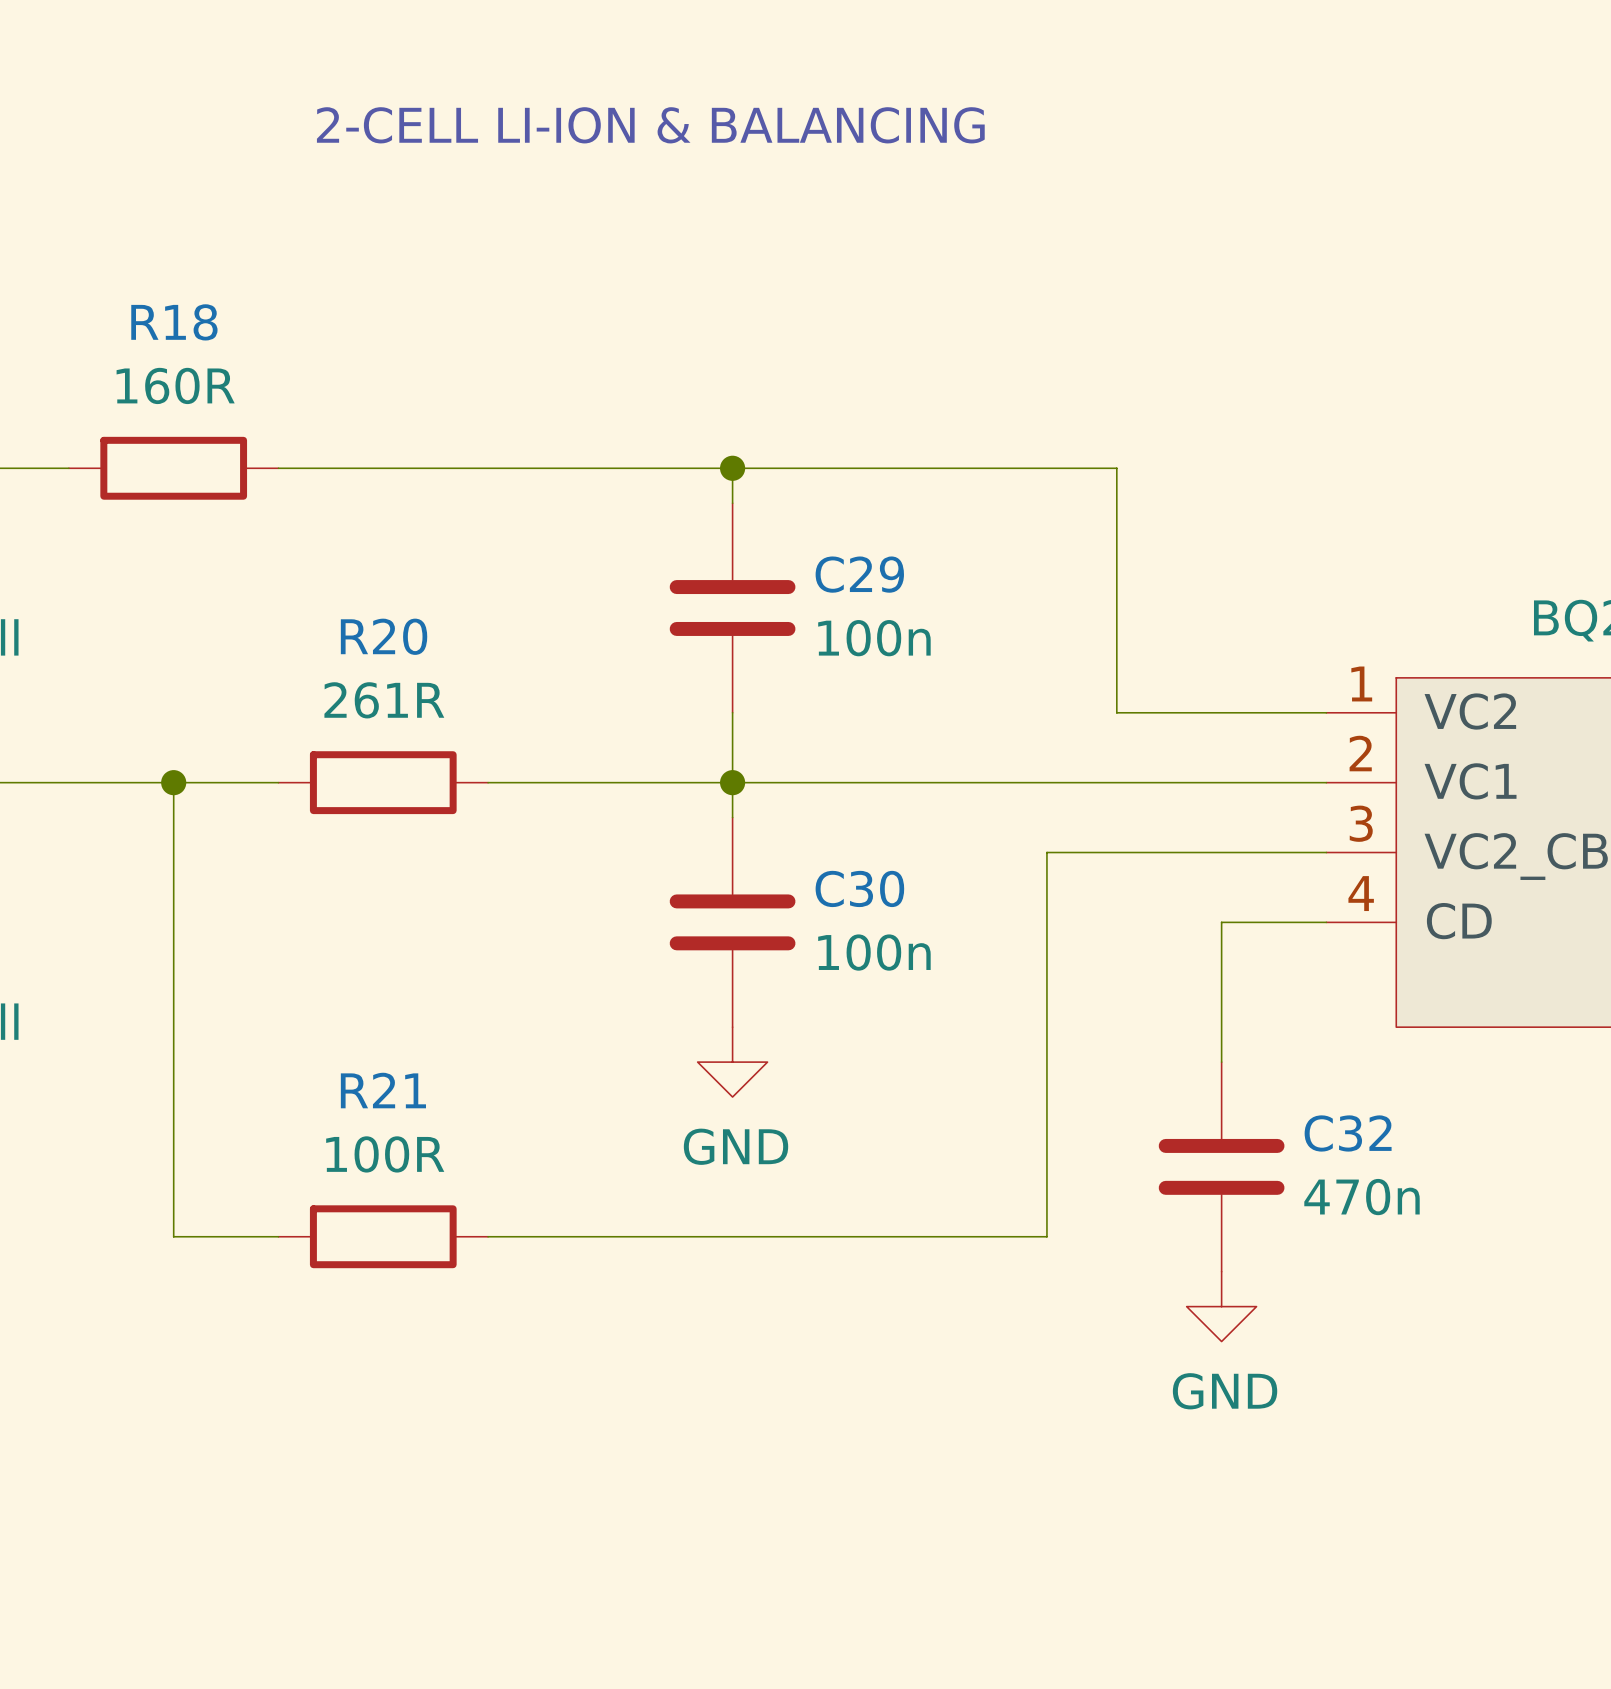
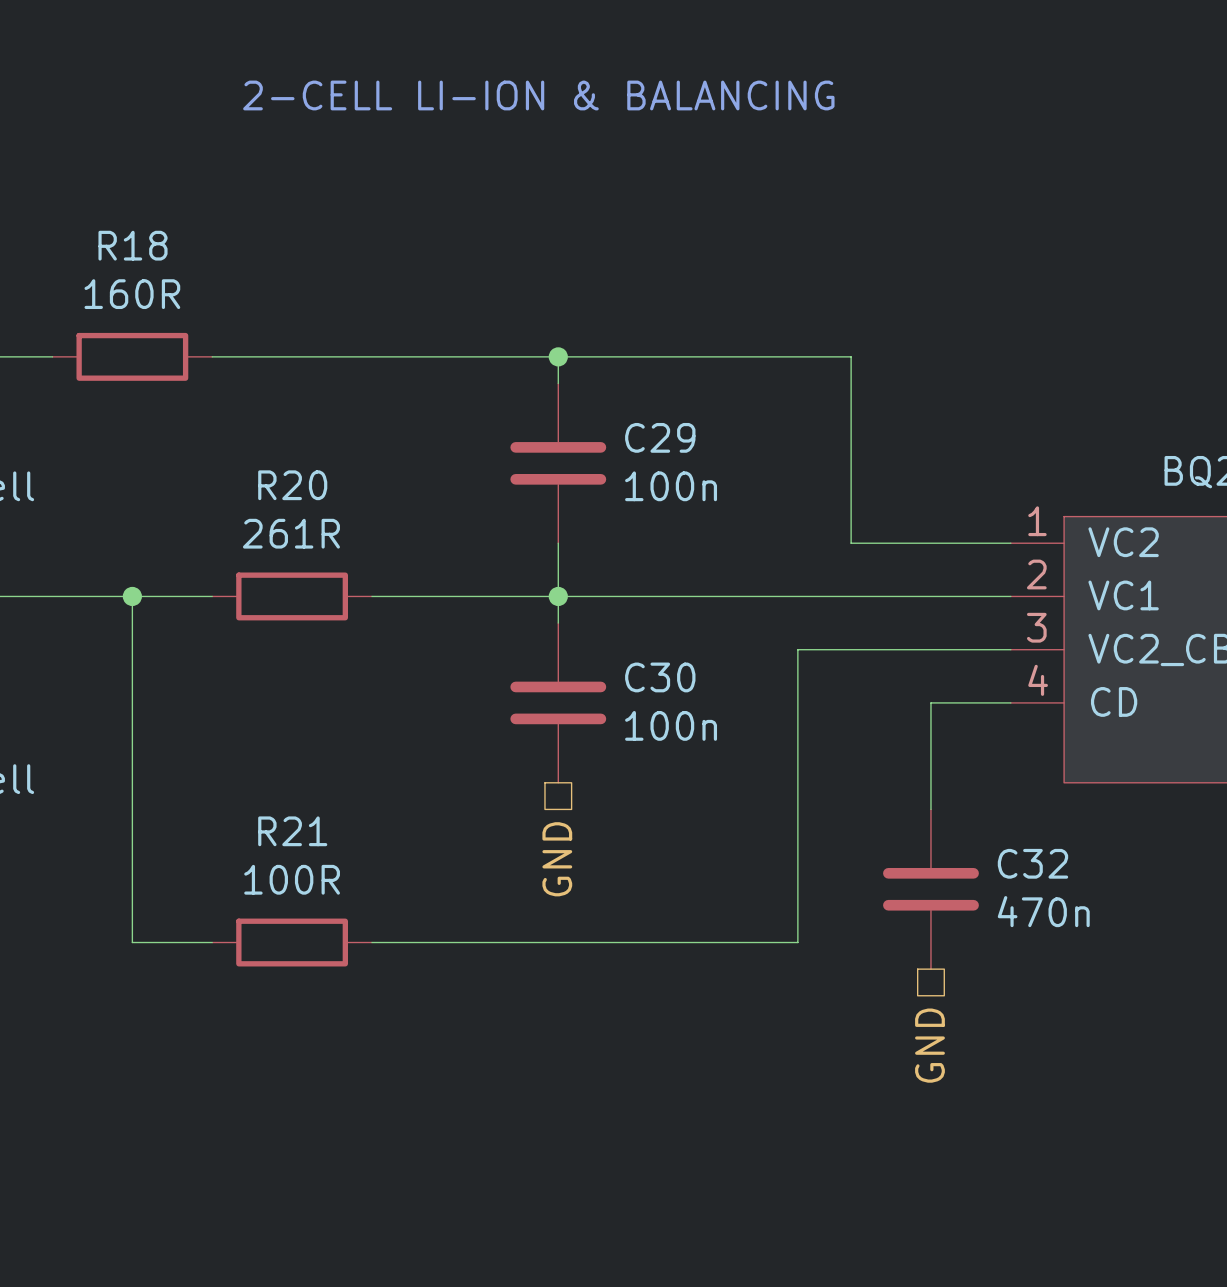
power symbol: GND (732, 1062) -> none
hierarchical label: none -> GND (557, 859)
power symbol: GND (1221, 1306) -> none
hierarchical label: none -> GND (929, 1045)

